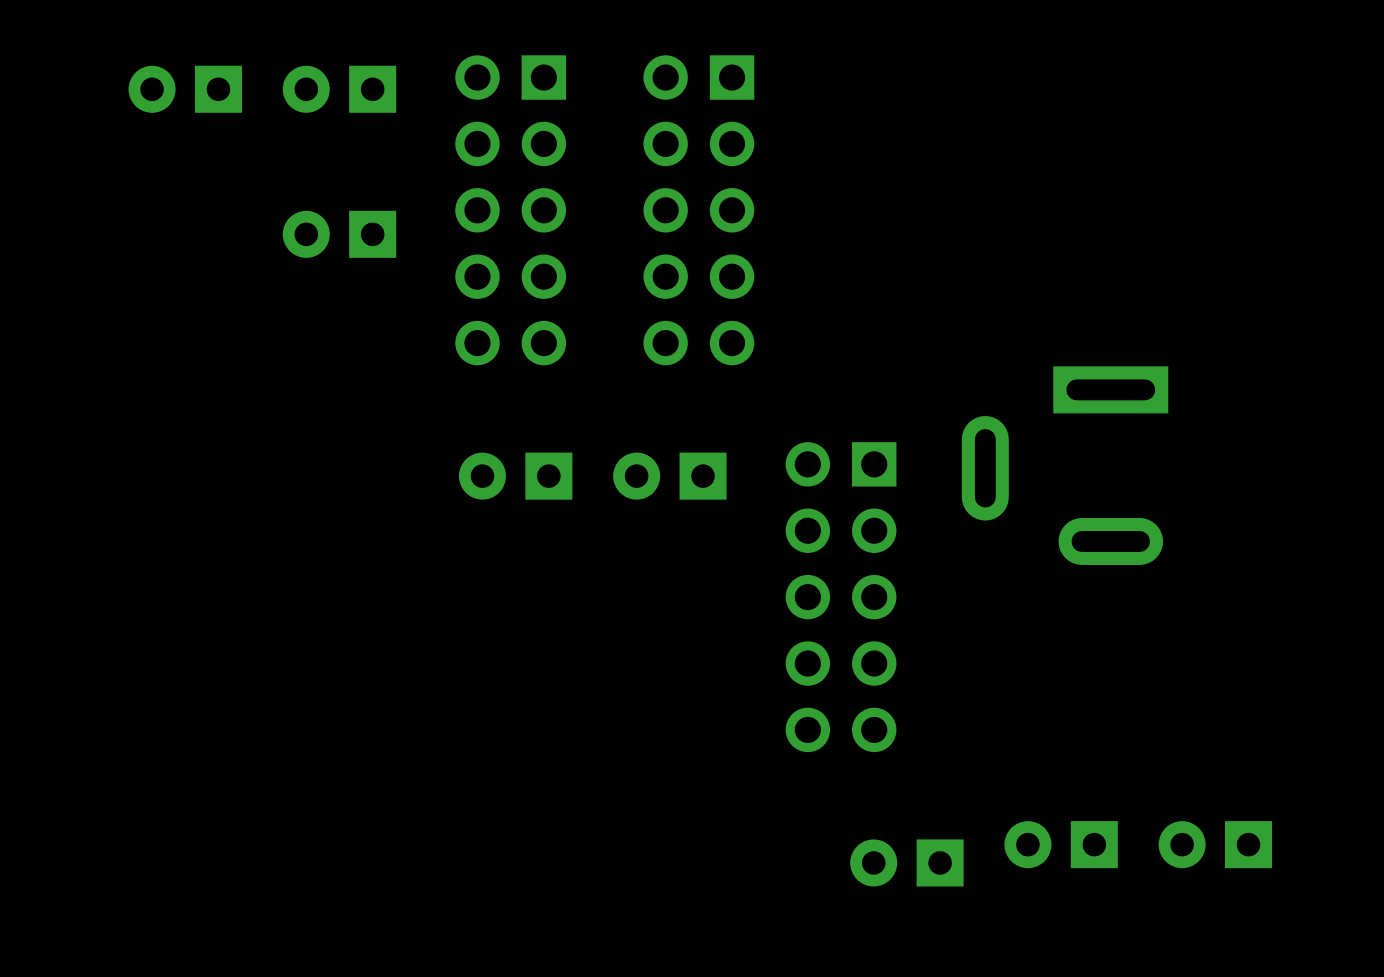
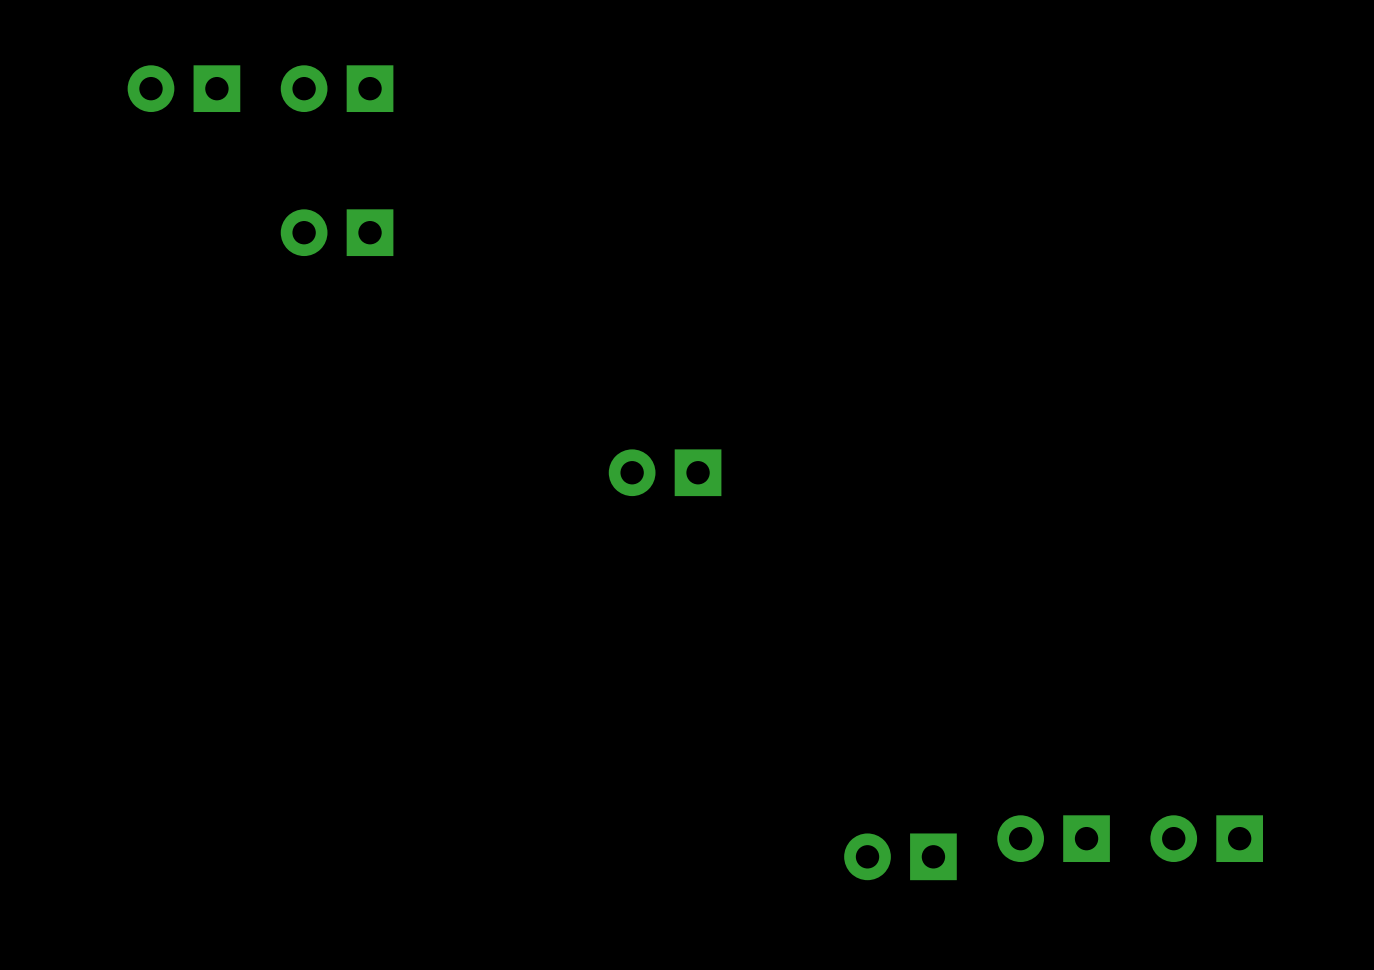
part: (510, 210) -> none
part: (698, 210) -> none
part: (1065, 465) -> none
part: (515, 476) -> none
part: (841, 597) -> none

